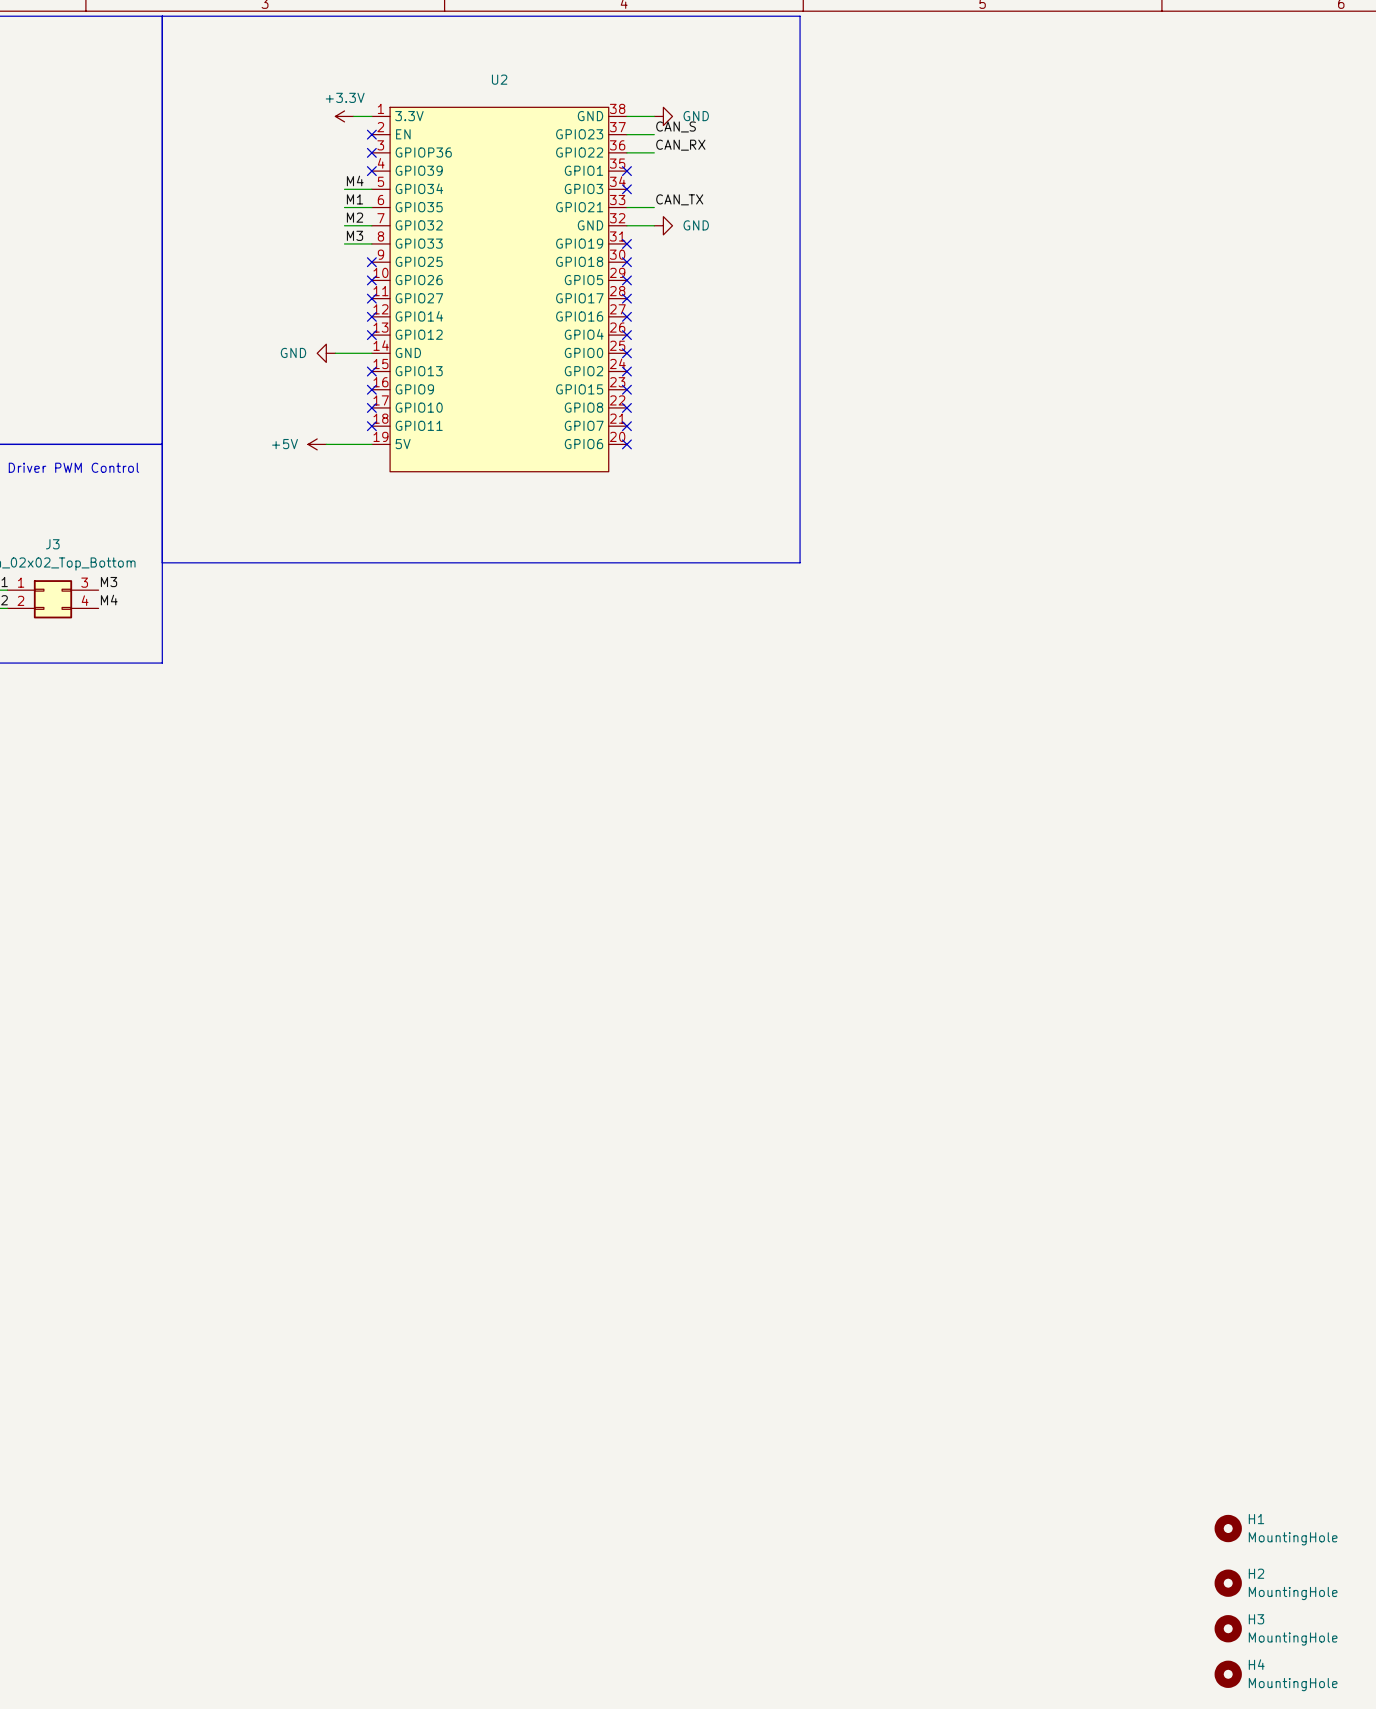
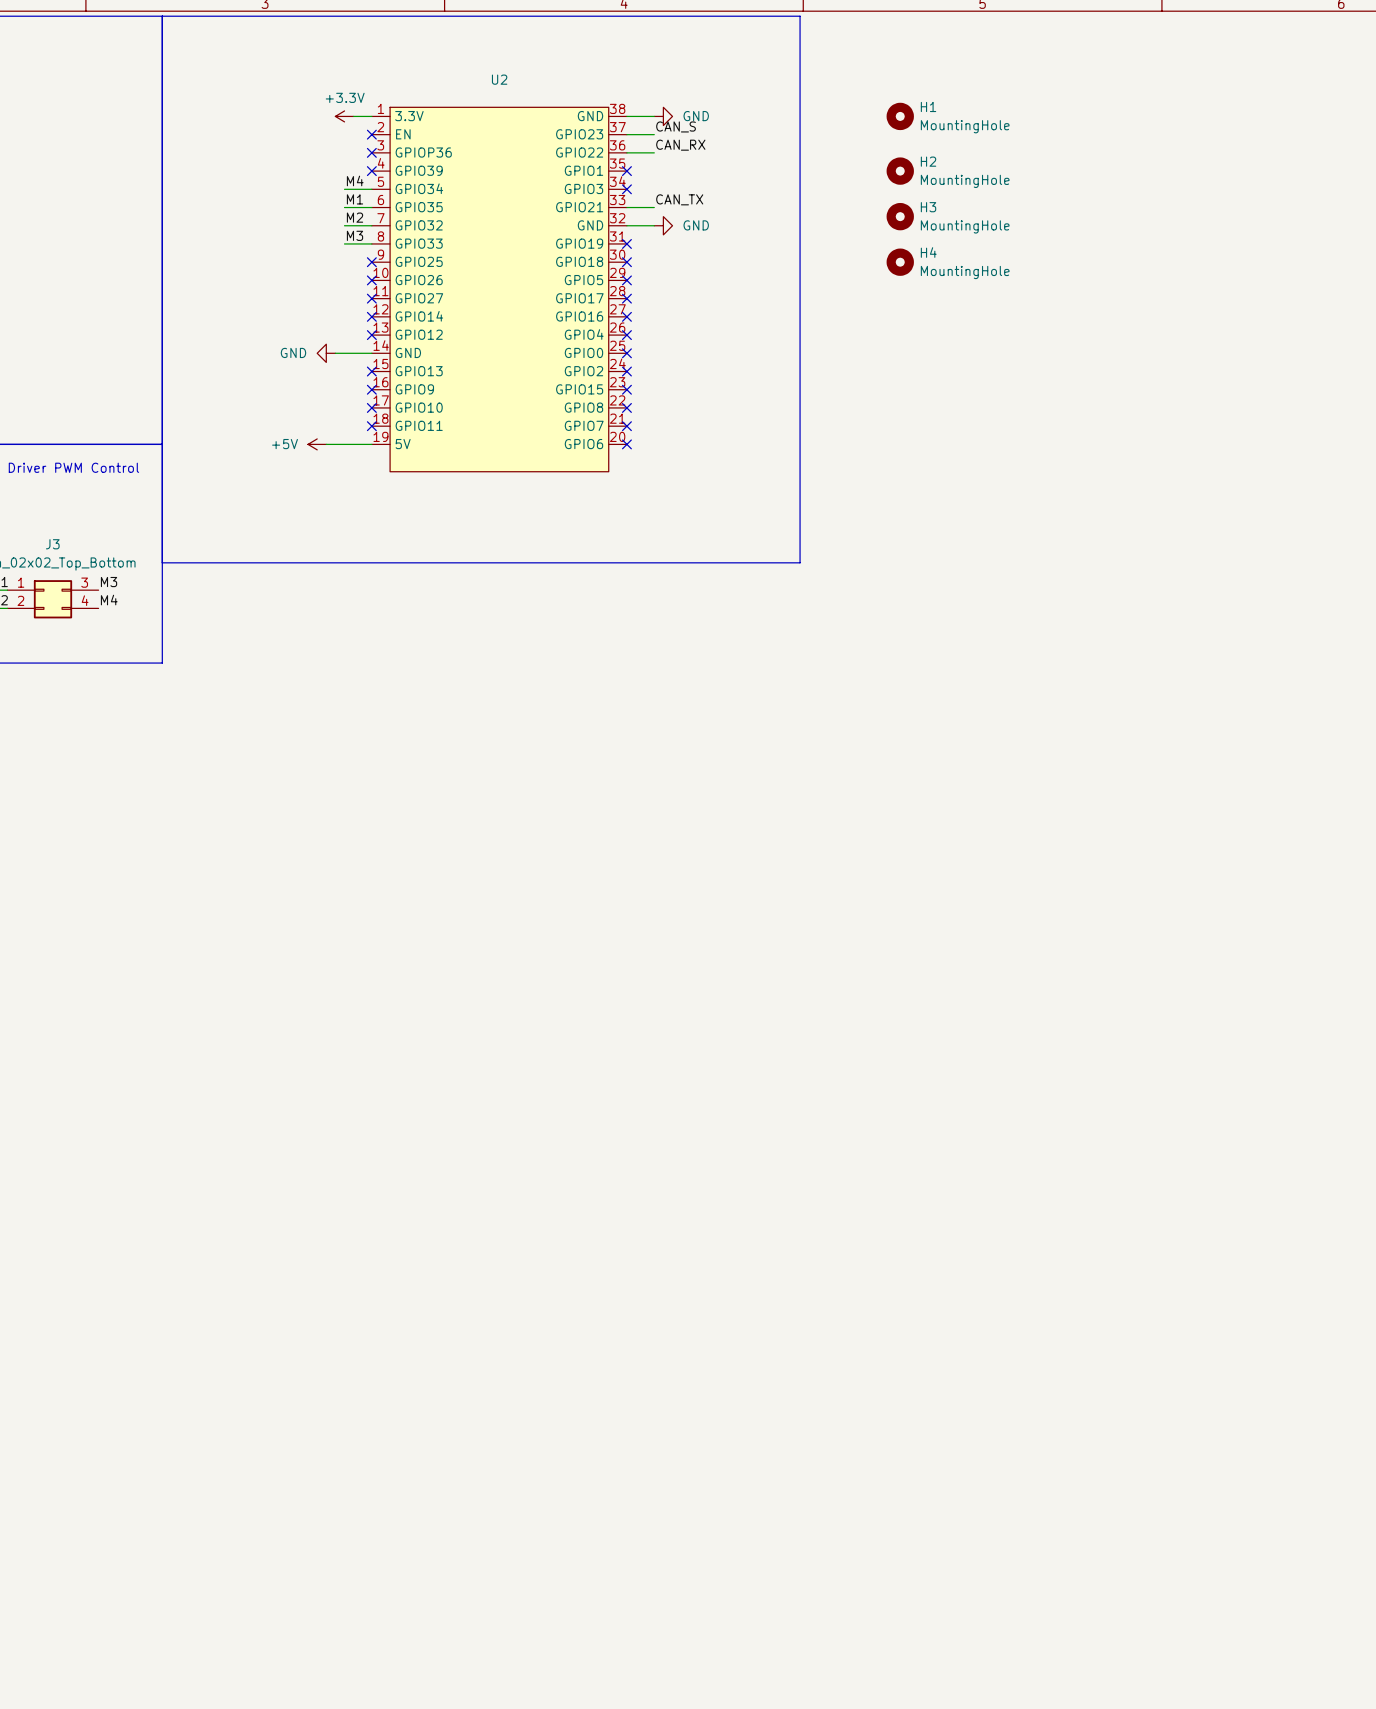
H1 position: (1228, 1528) -> (900, 116)
H2 position: (1228, 1583) -> (900, 171)
H3 position: (1228, 1628) -> (900, 216)
H4 position: (1228, 1674) -> (900, 262)

